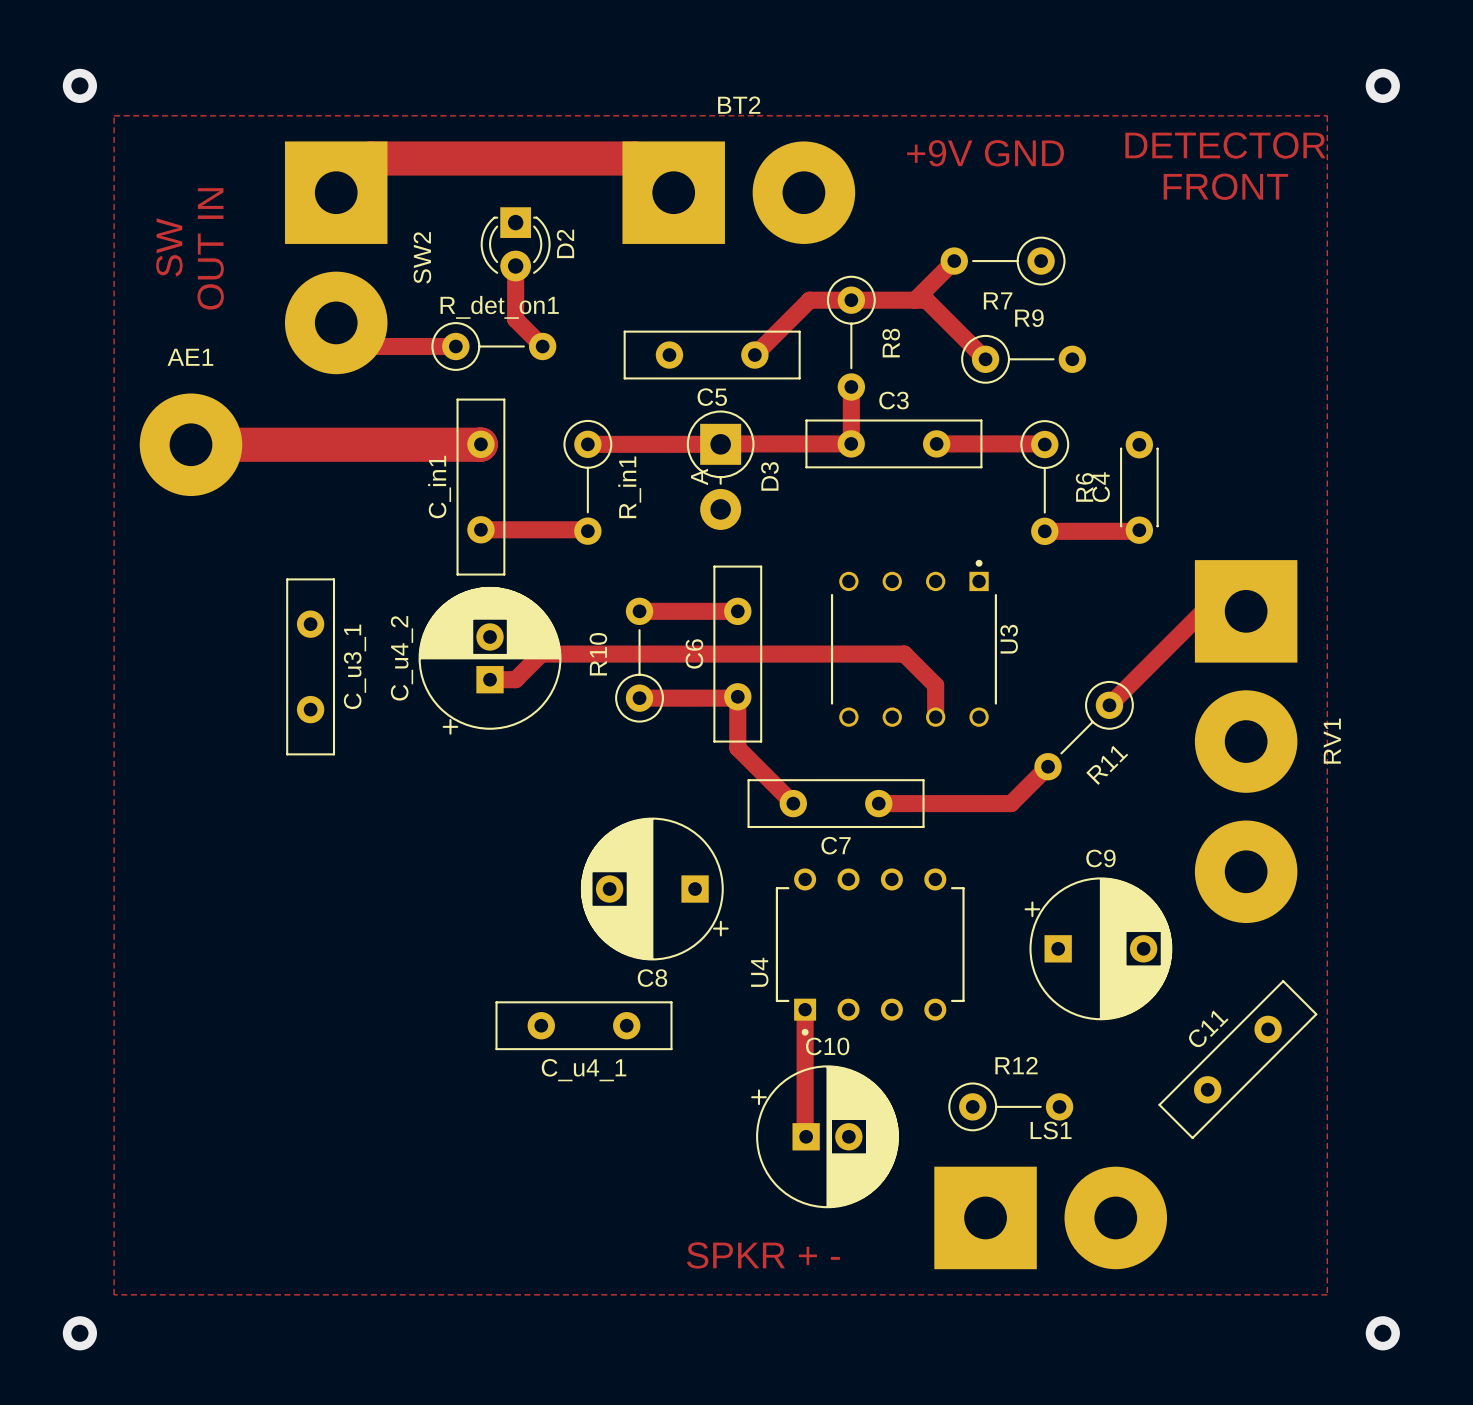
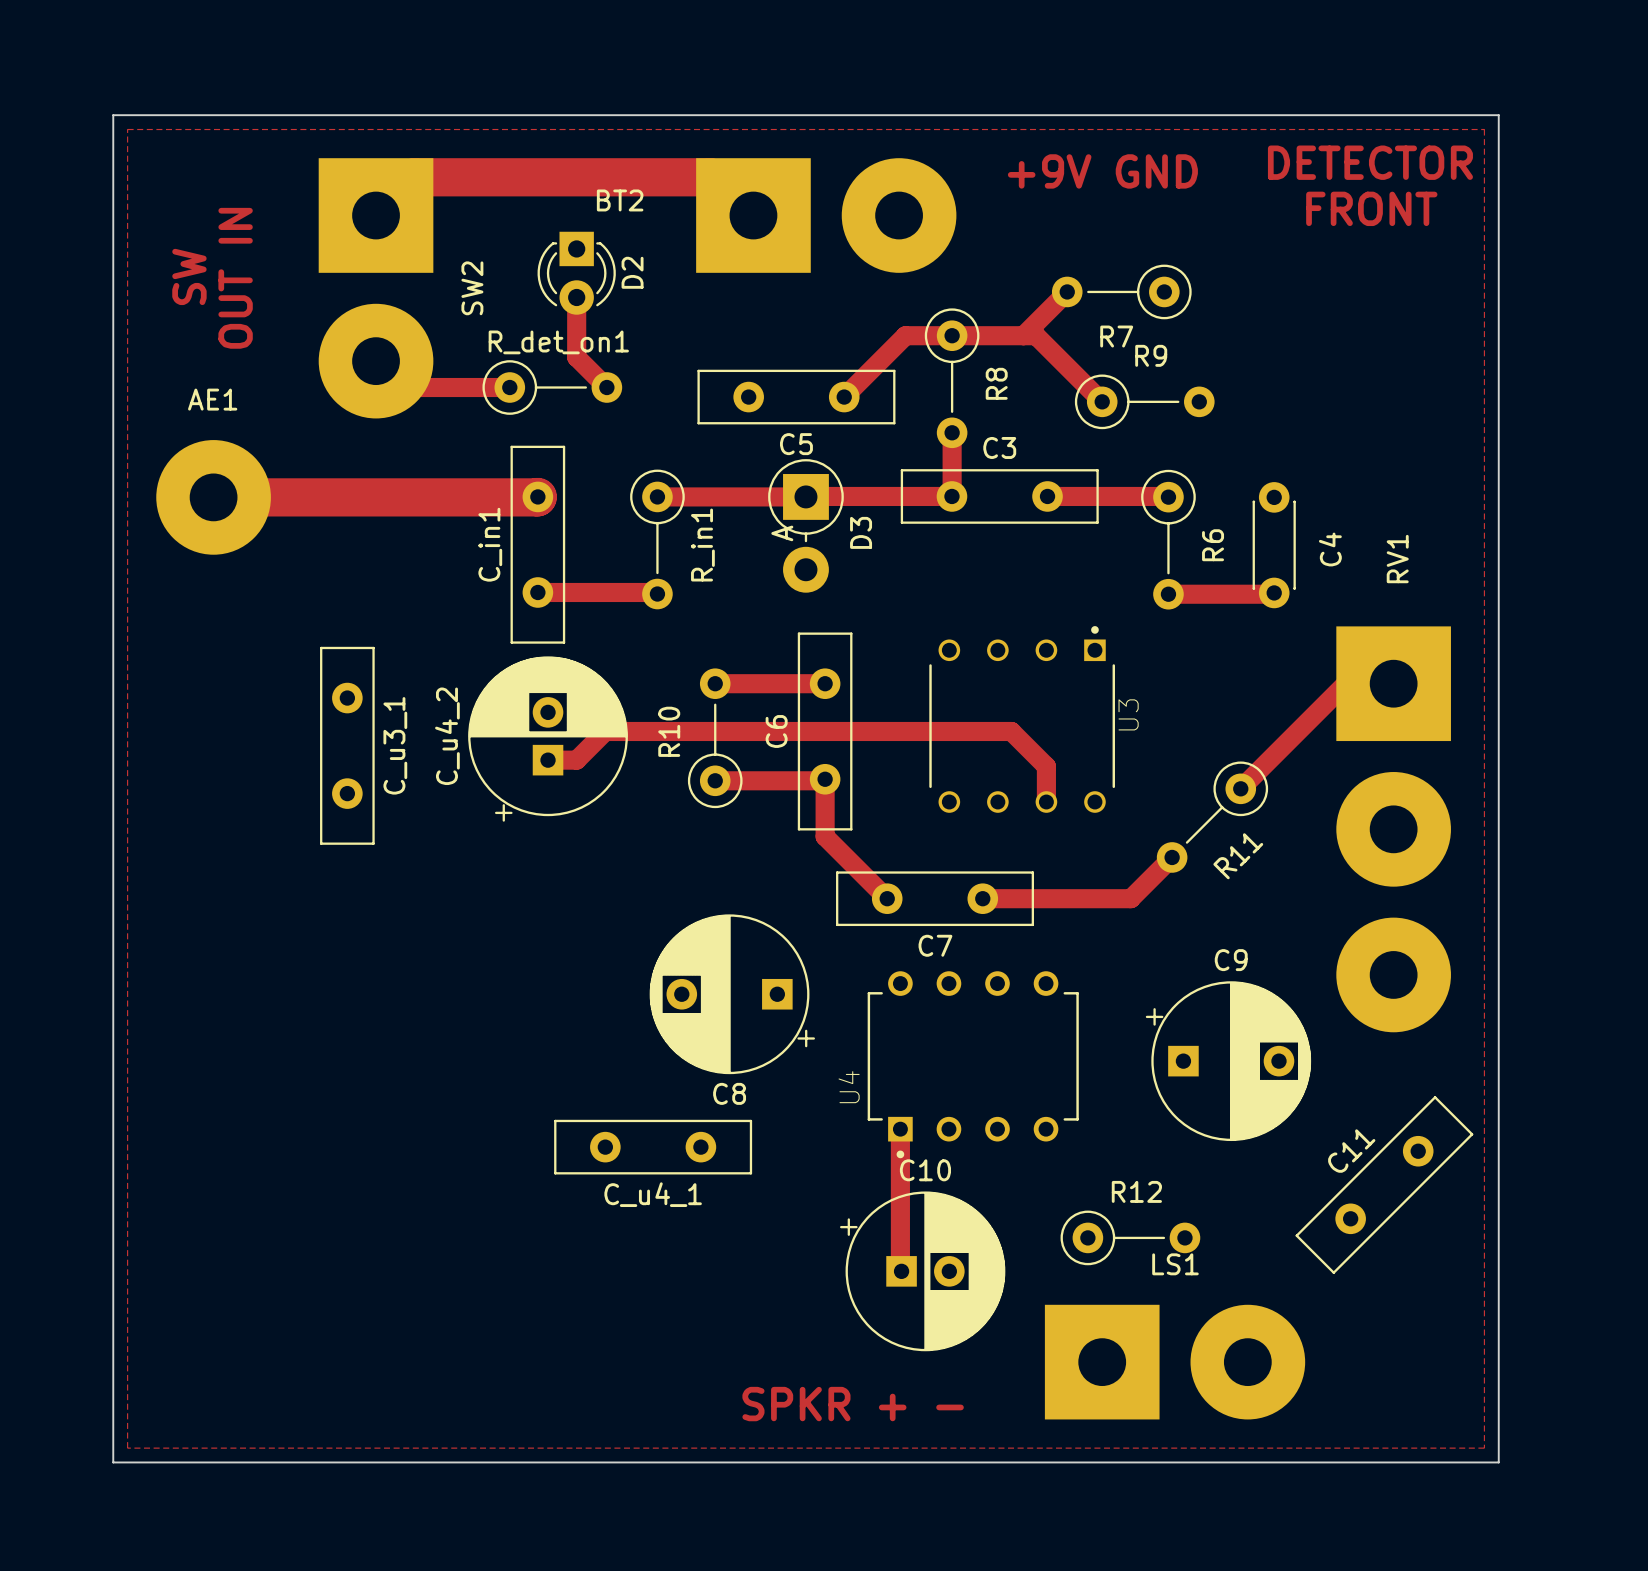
via: (79, 85) -> none
via: (1382, 85) -> none
board edge: none -> (113, 115) (1498, 115) (1498, 1462) (113, 1462) (113, 115)
BT2 name position: BT2 (739, 105) -> BT2 (620, 200)
C4 name position: C4 (1101, 487) -> C4 (1330, 549)
RV1 name position: RV1 (1332, 741) -> RV1 (1397, 559)
via: (79, 1333) -> none
via: (1382, 1333) -> none

